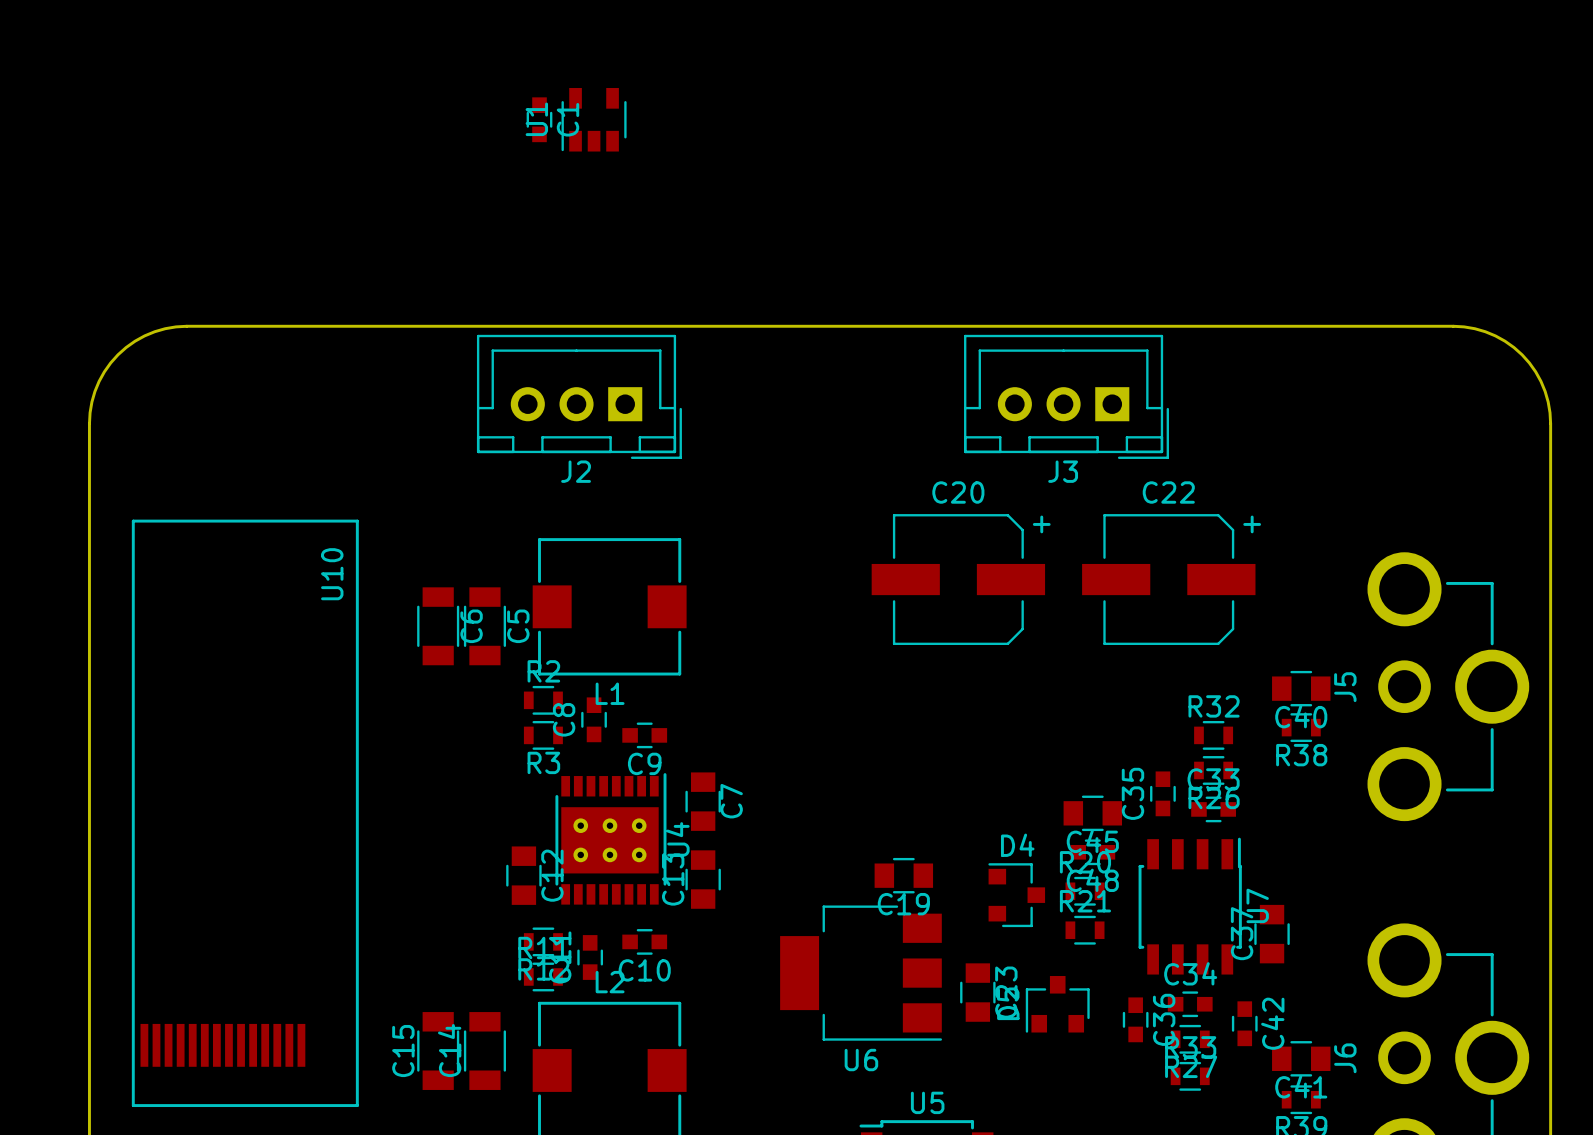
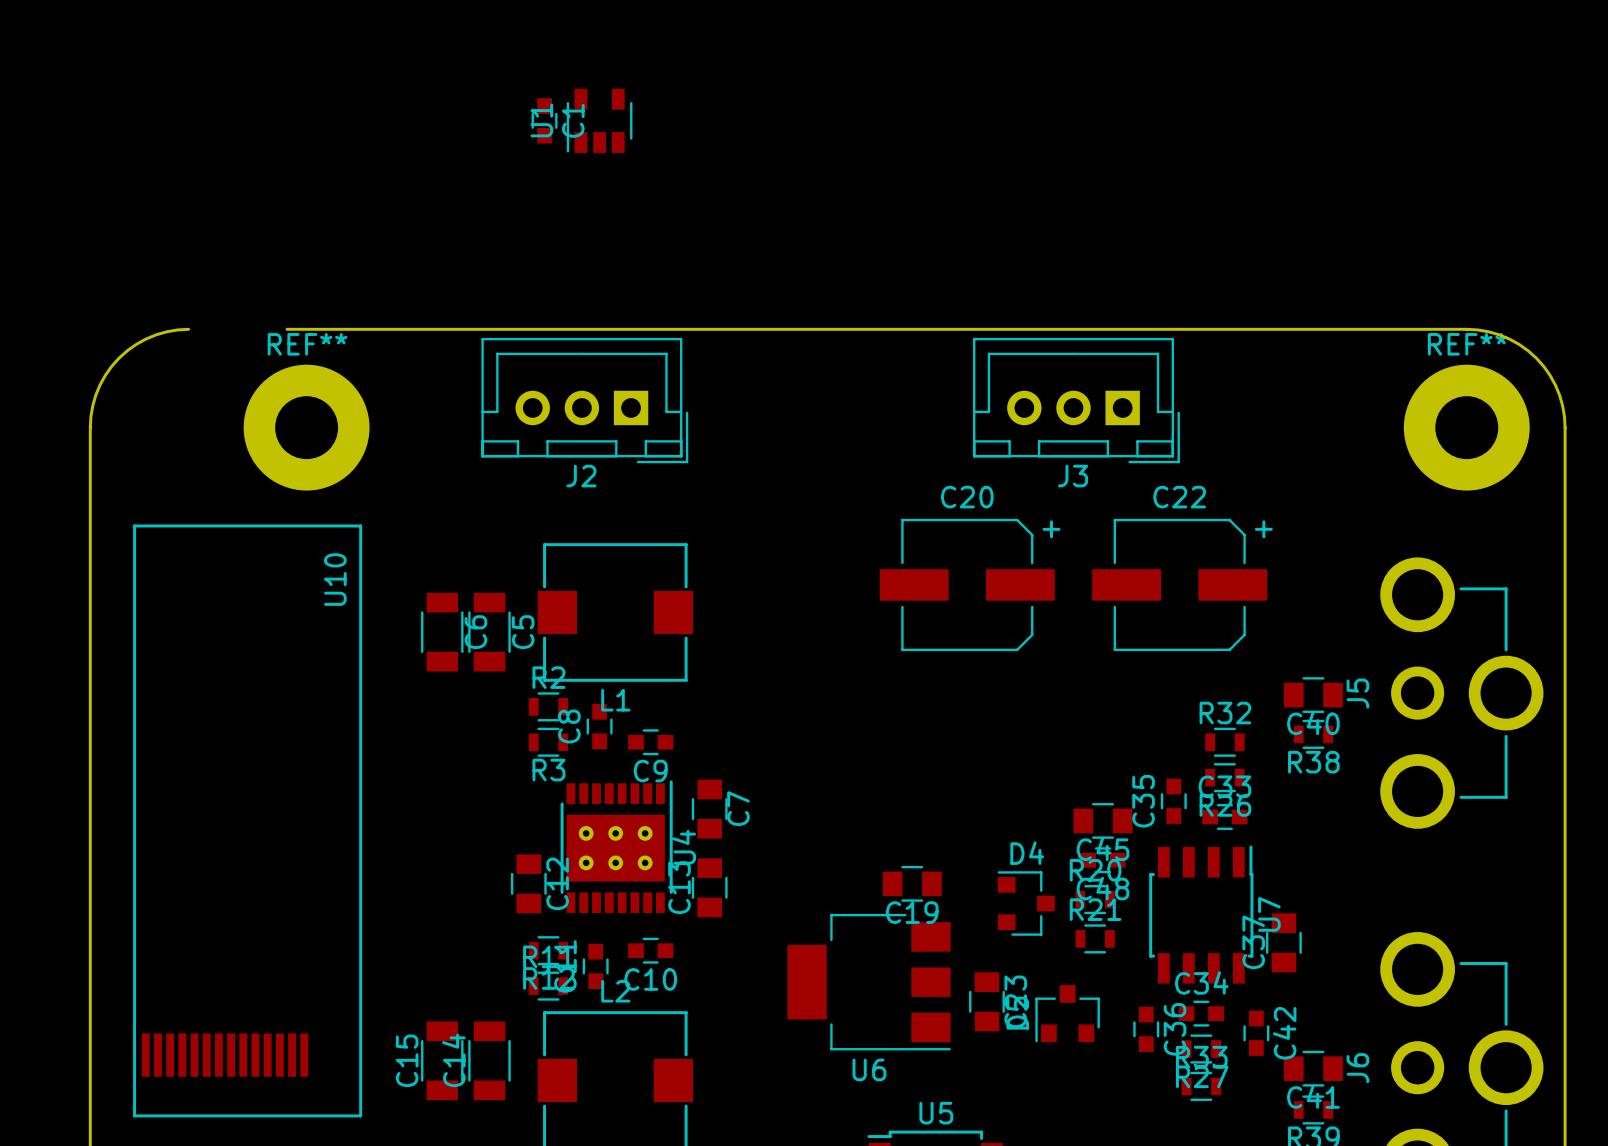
board edge: (186, 326) (284, 326) -> none
REF**: none -> (306, 427)
REF**: none -> (1466, 427)

